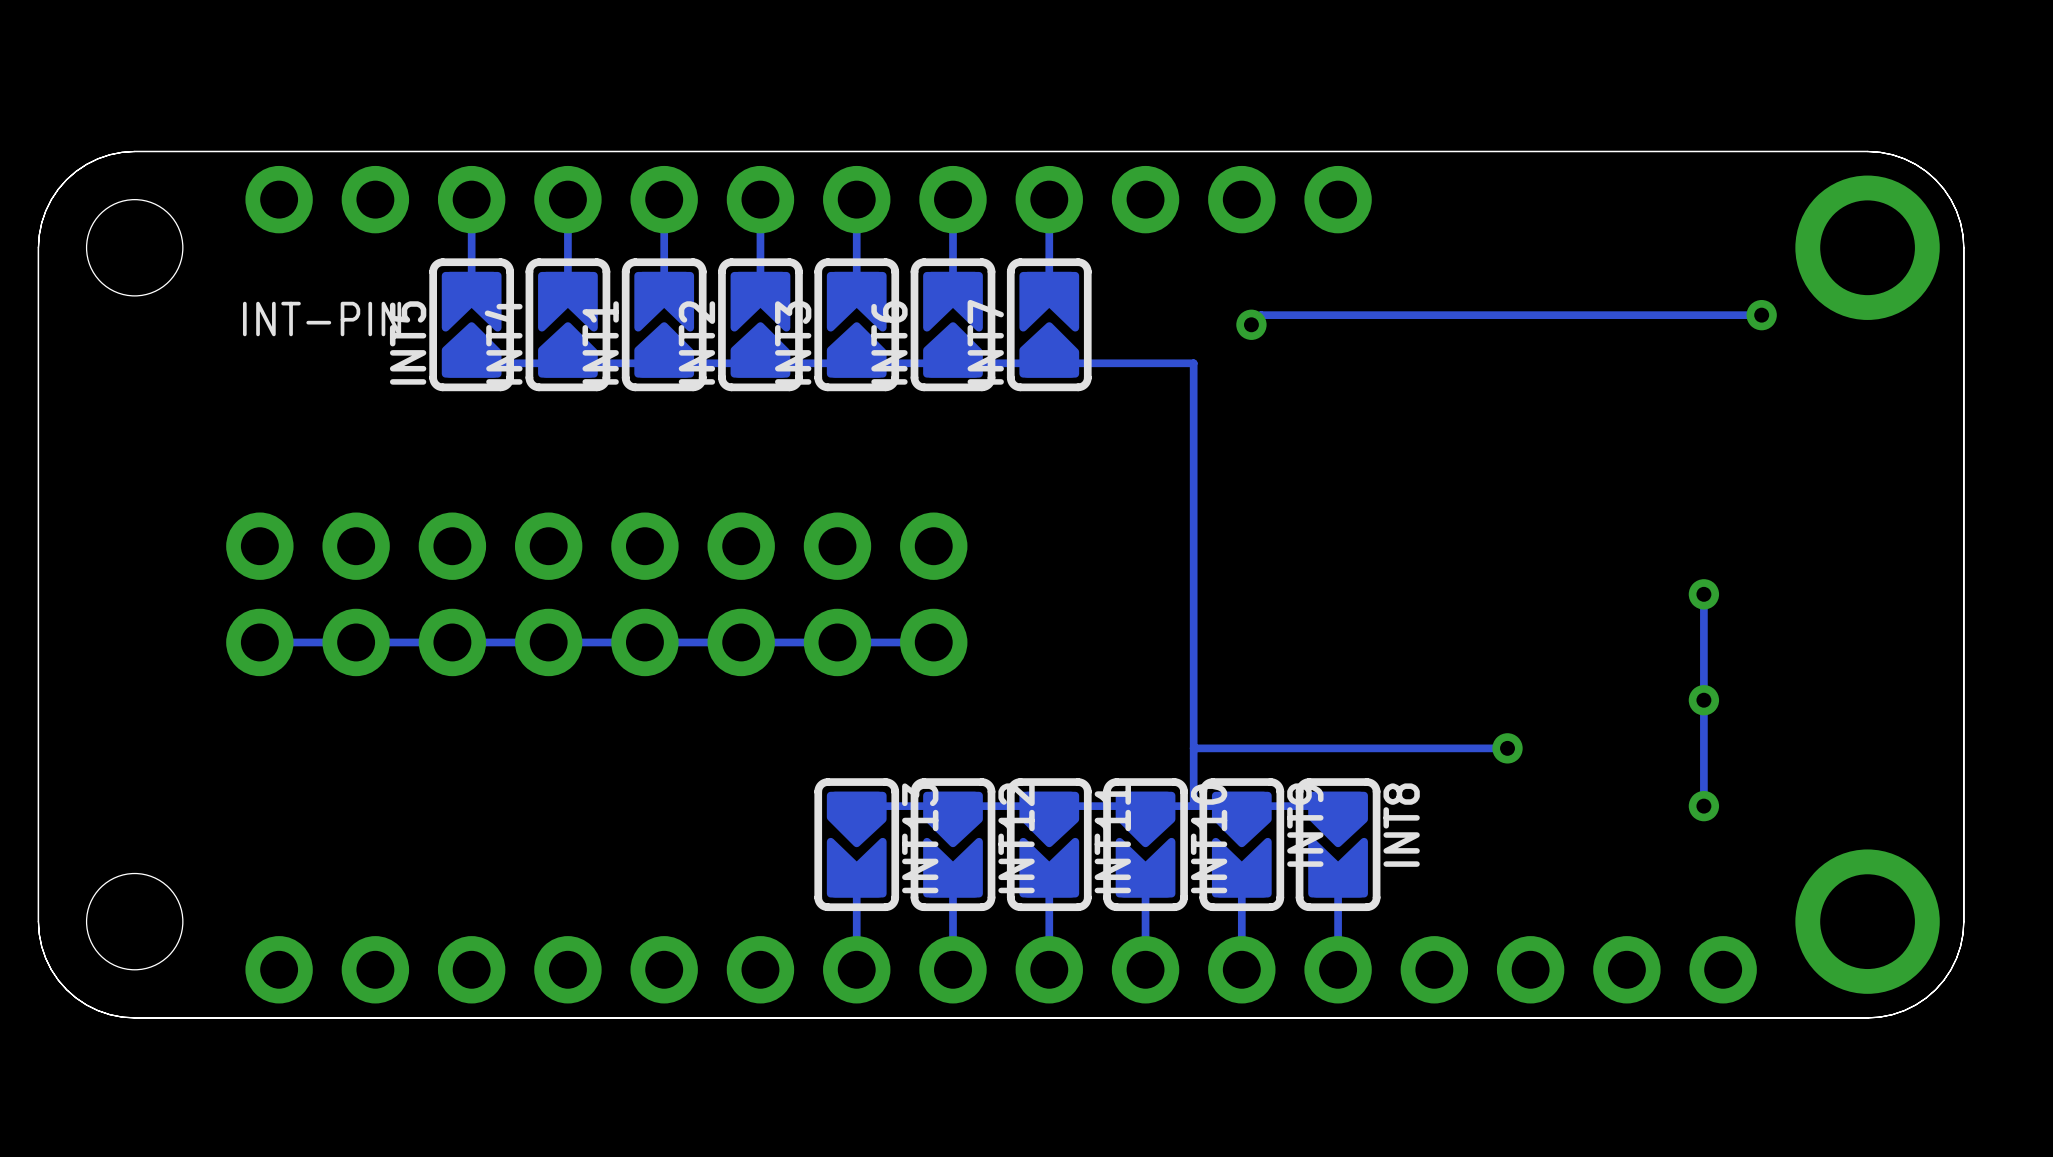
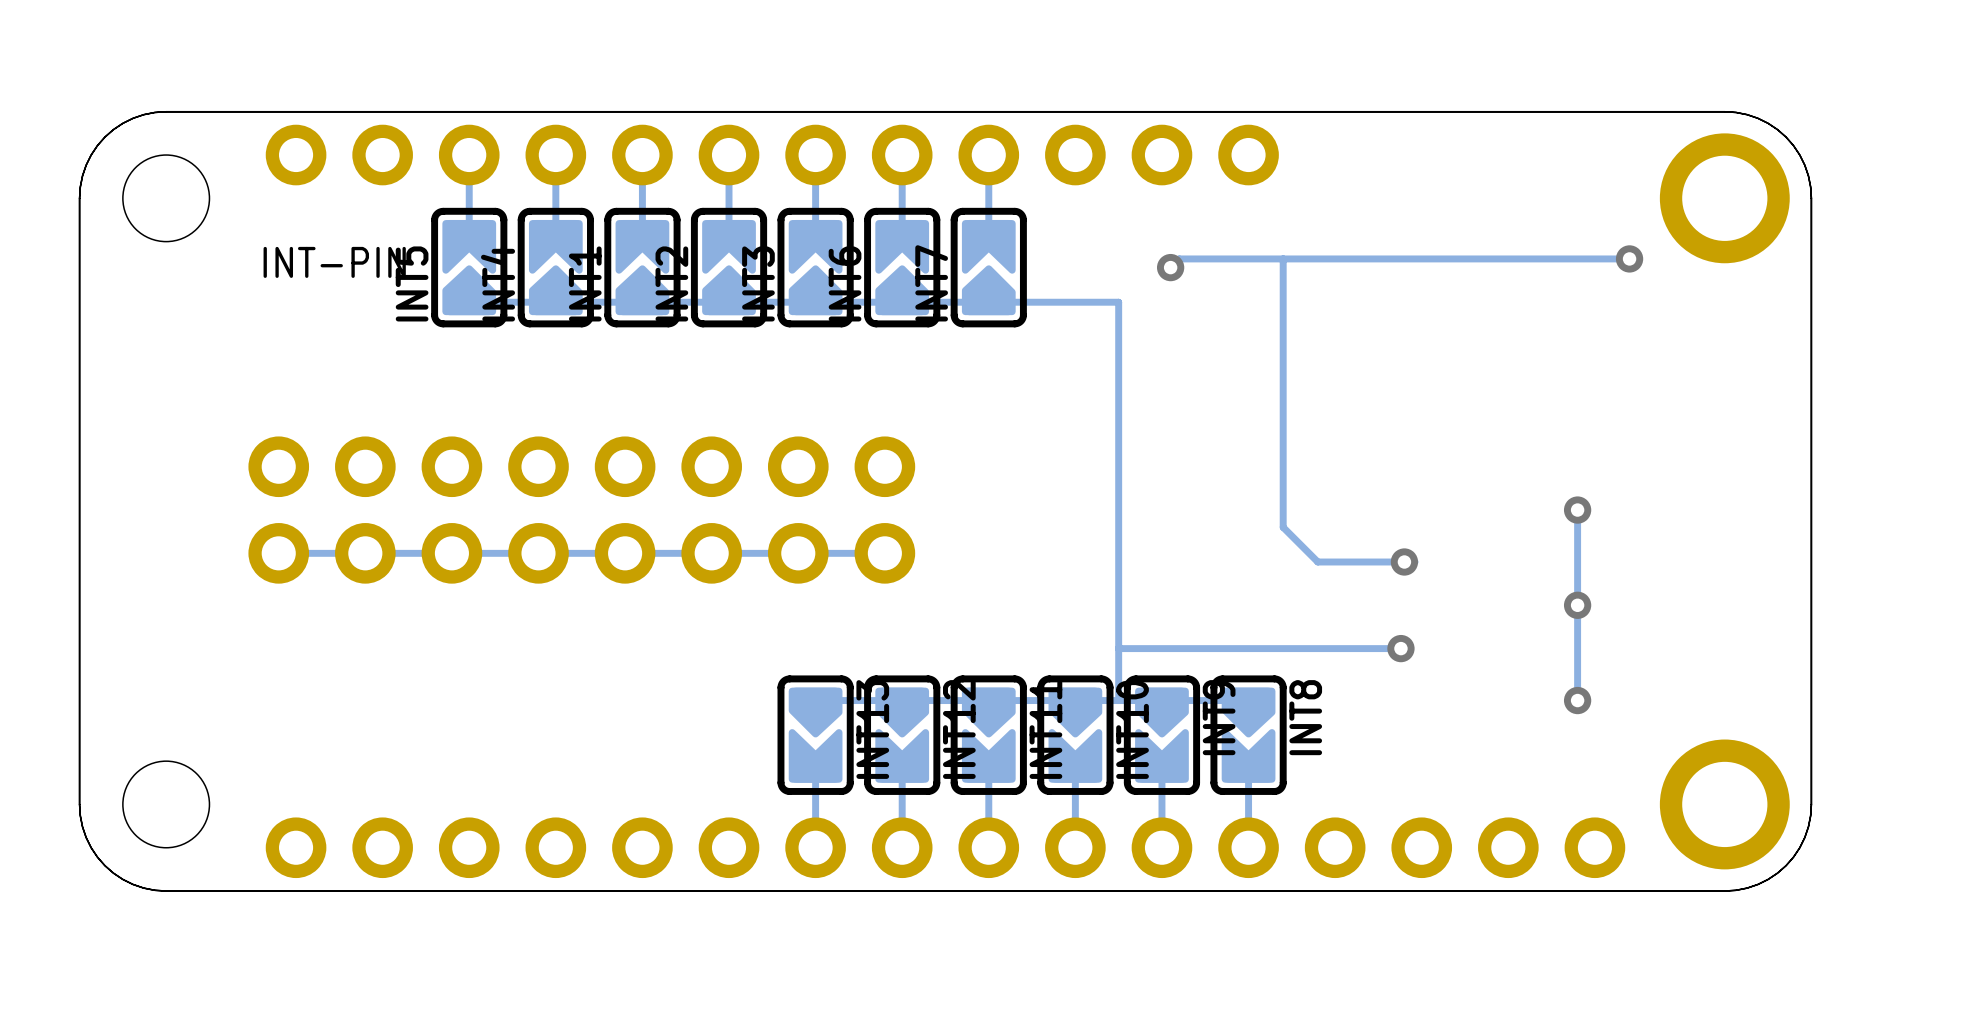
track: none -> (1283, 258) (1283, 527) (1317, 562) (1415, 562)
via: none -> (1404, 562)

